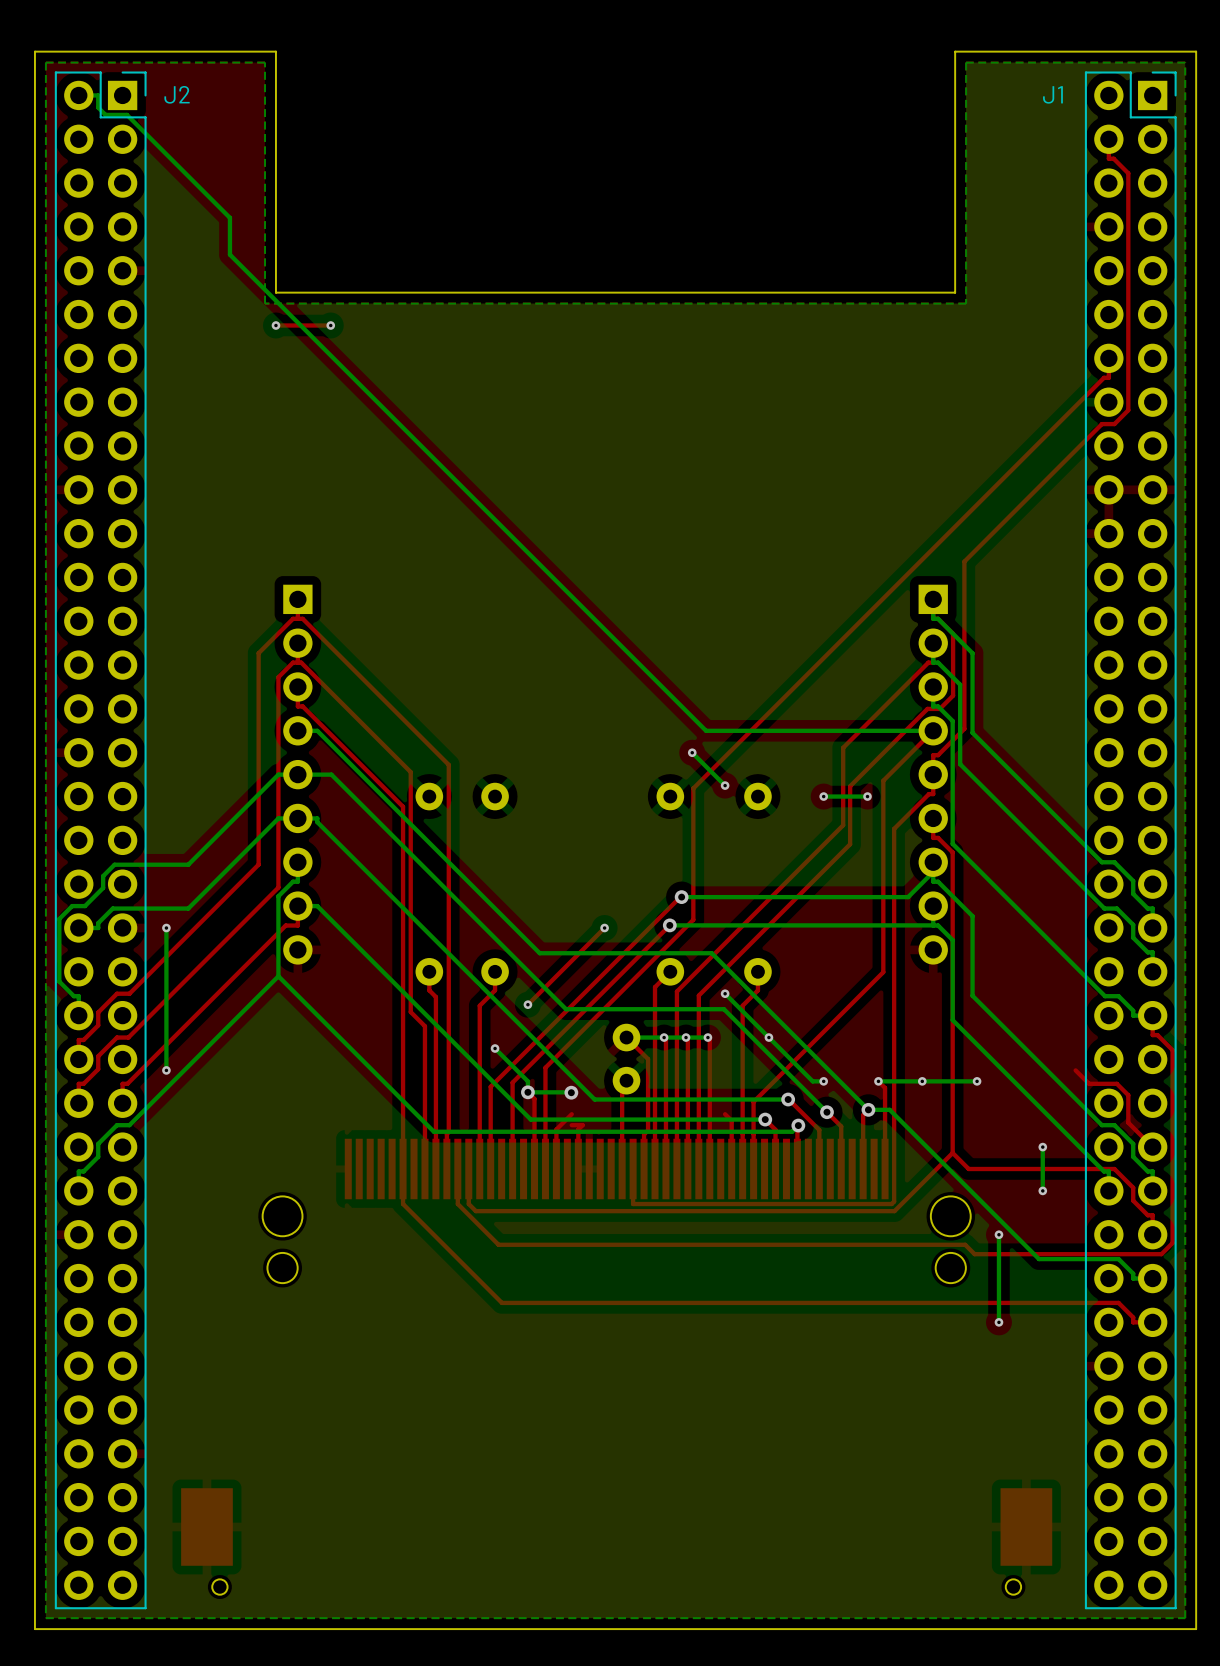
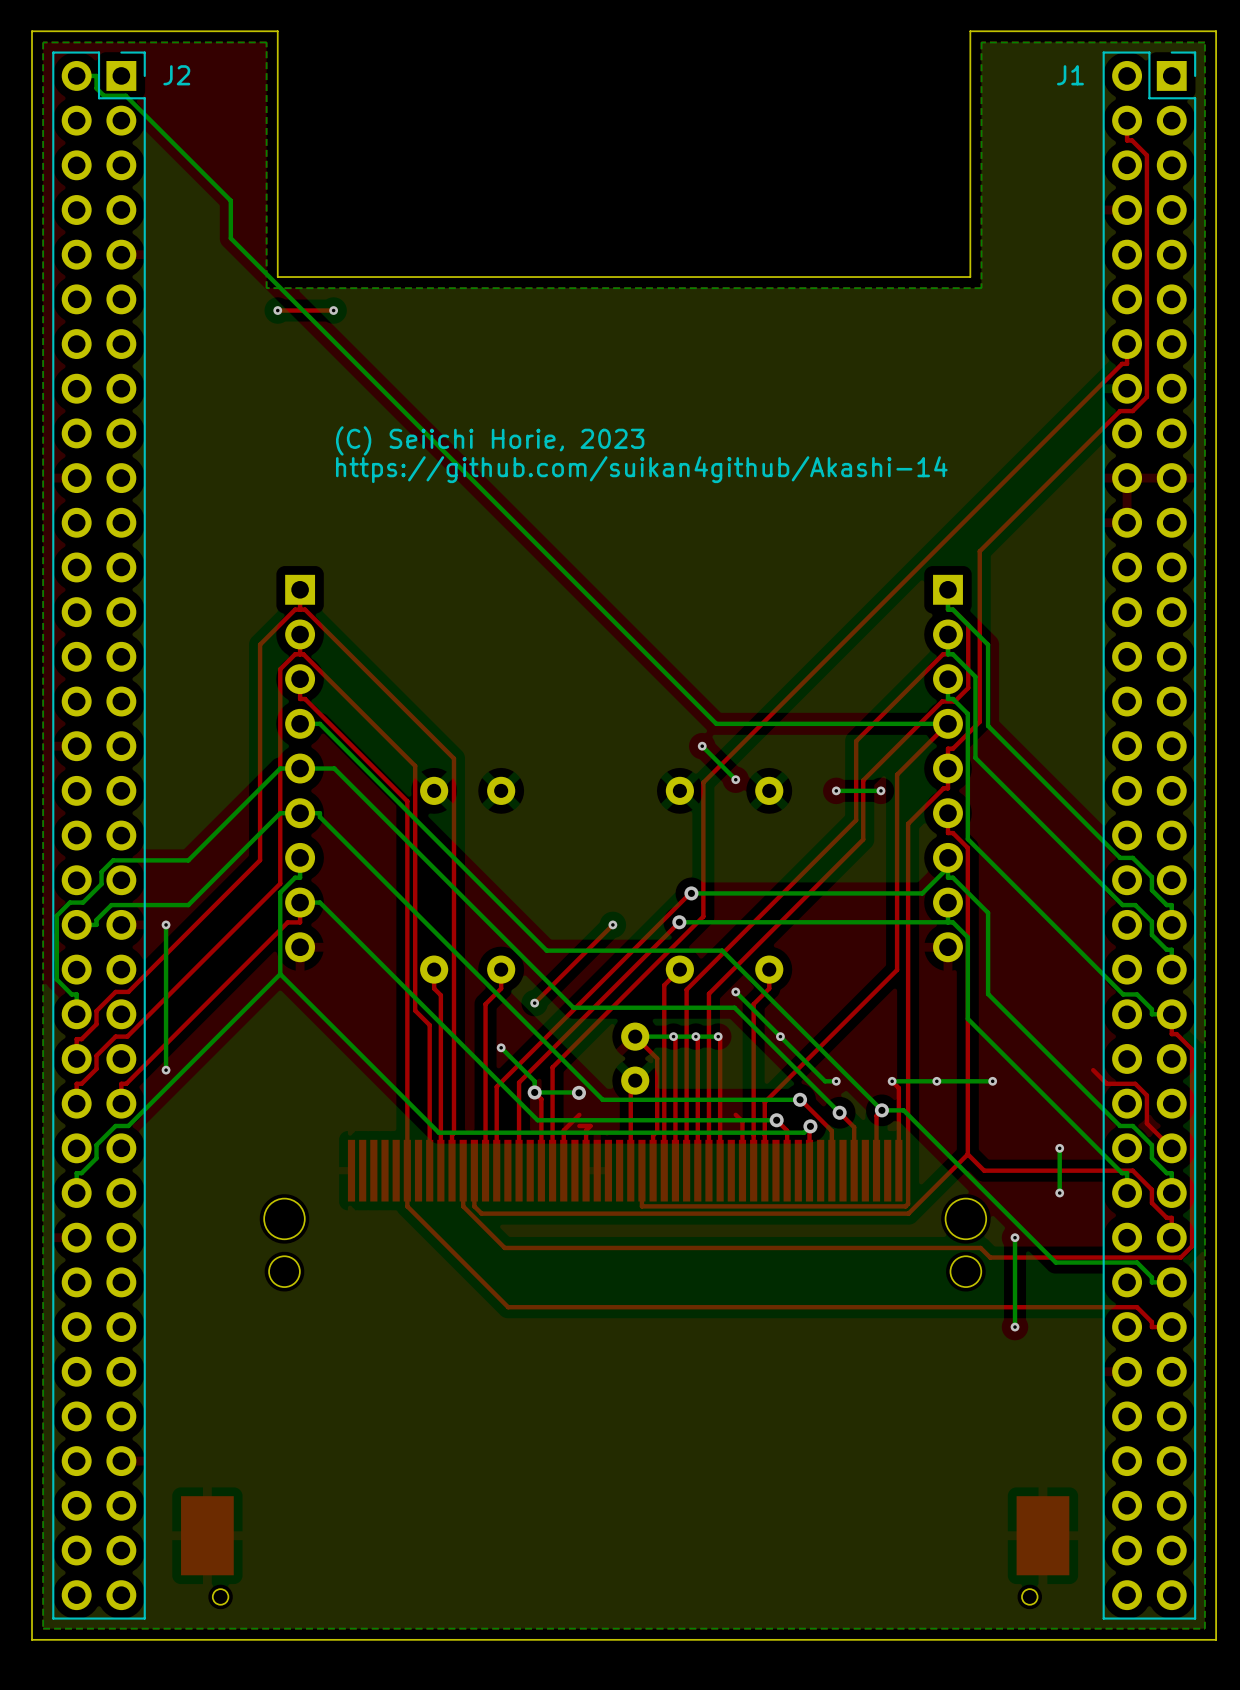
text: none -> (C) Seiichi Horie, 2023 (490, 440)
text: none -> https://github.com/suikan4github/Akashi-14 (641, 469)

